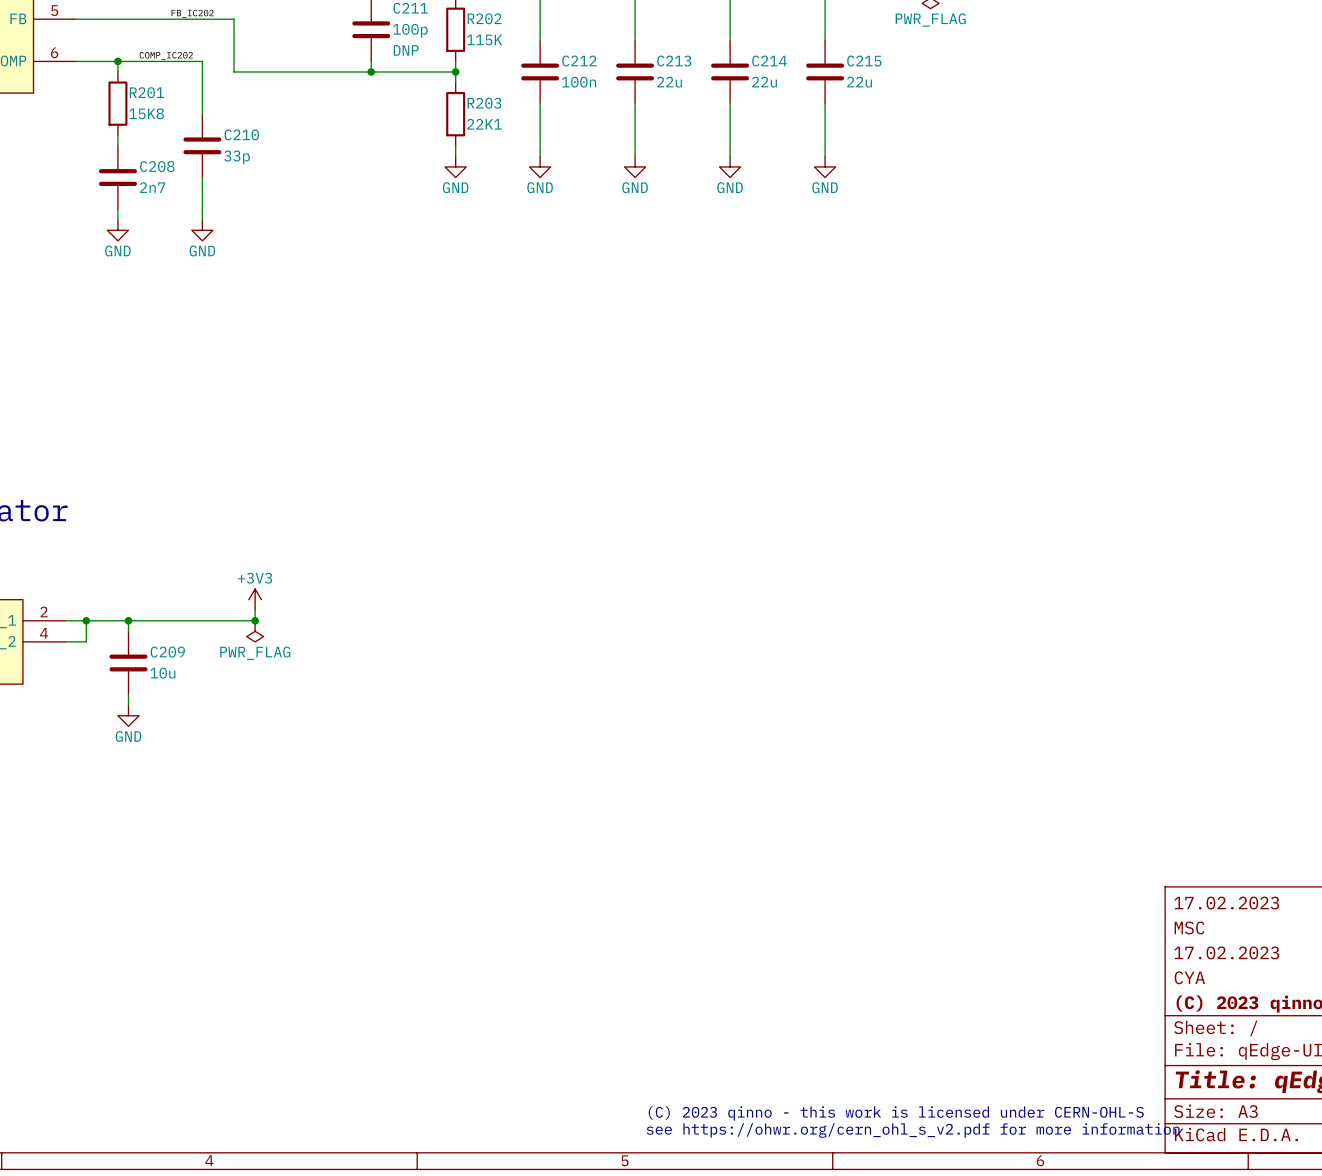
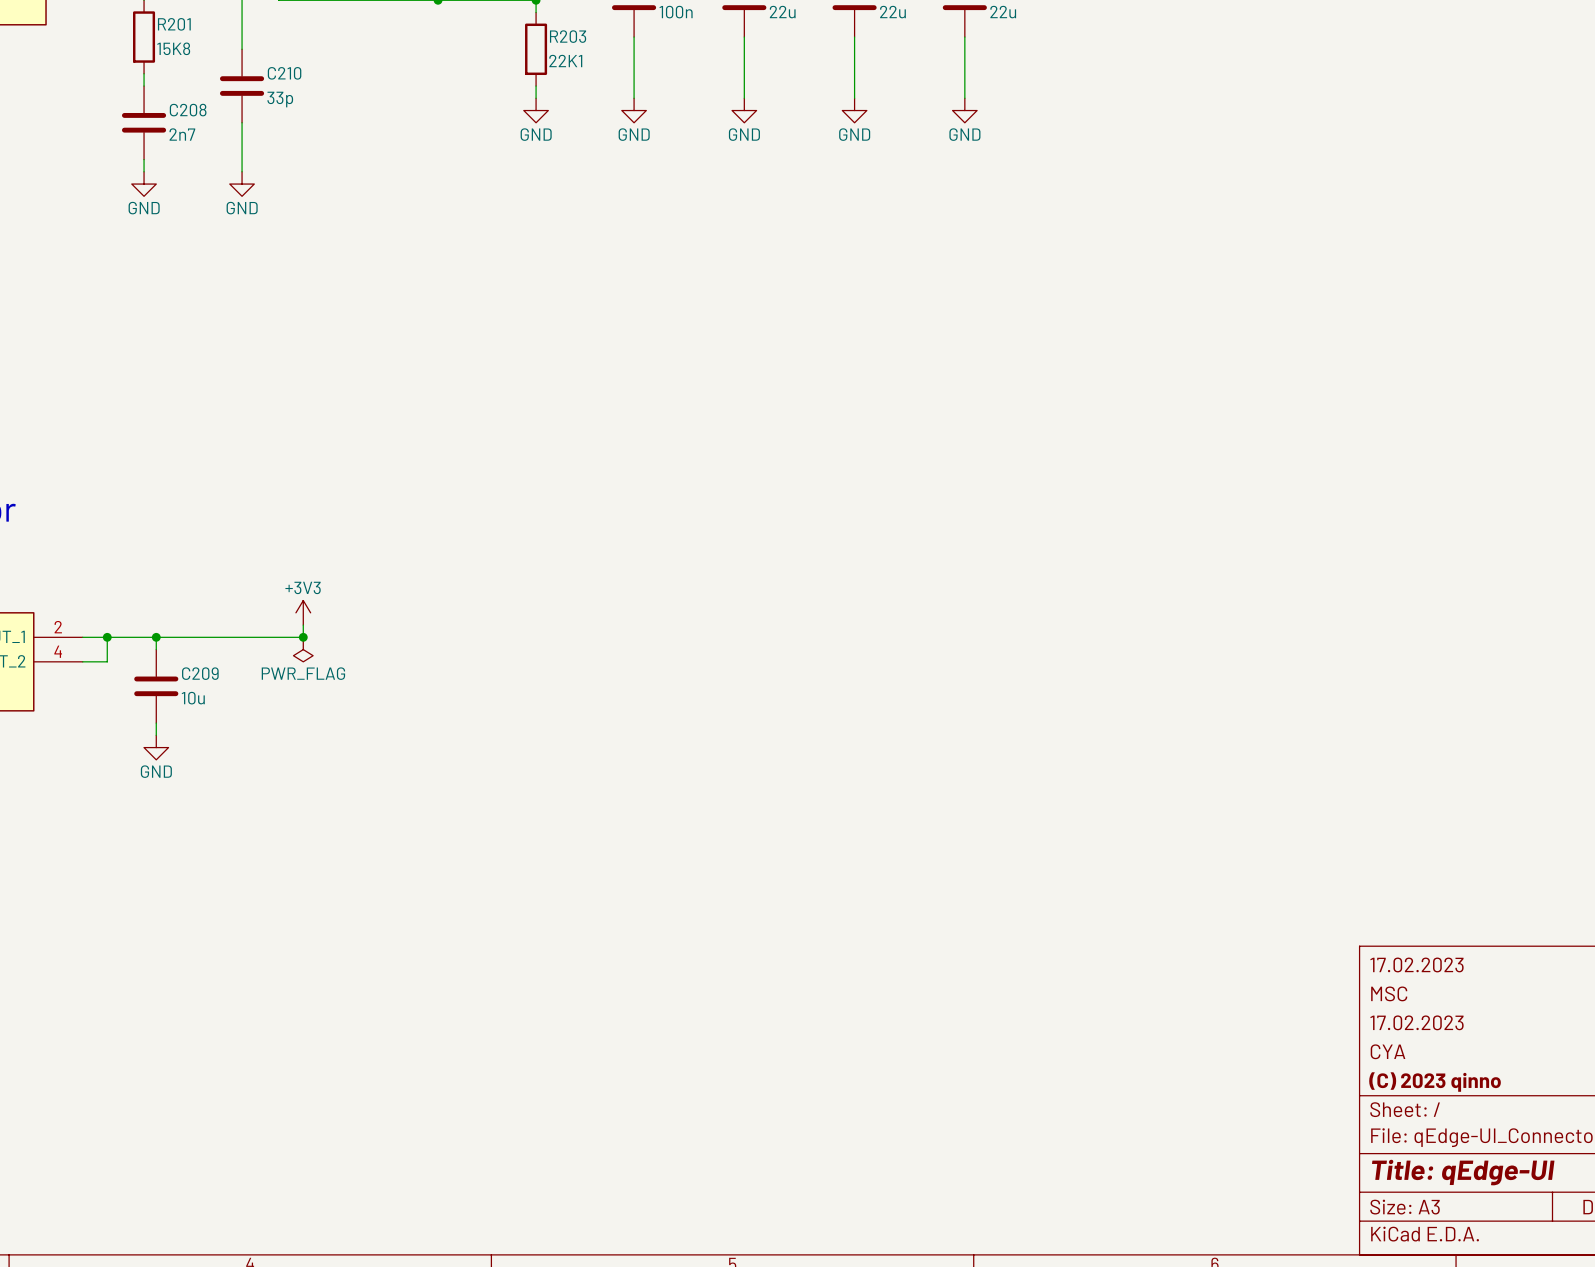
text: (C) 2023 qinno - this work is licensed under CERN-OHL-S (896, 1113) -> none
text: see https://ohwr.org/cern_ohl_s_v2.pdf for more information (913, 1130) -> none

